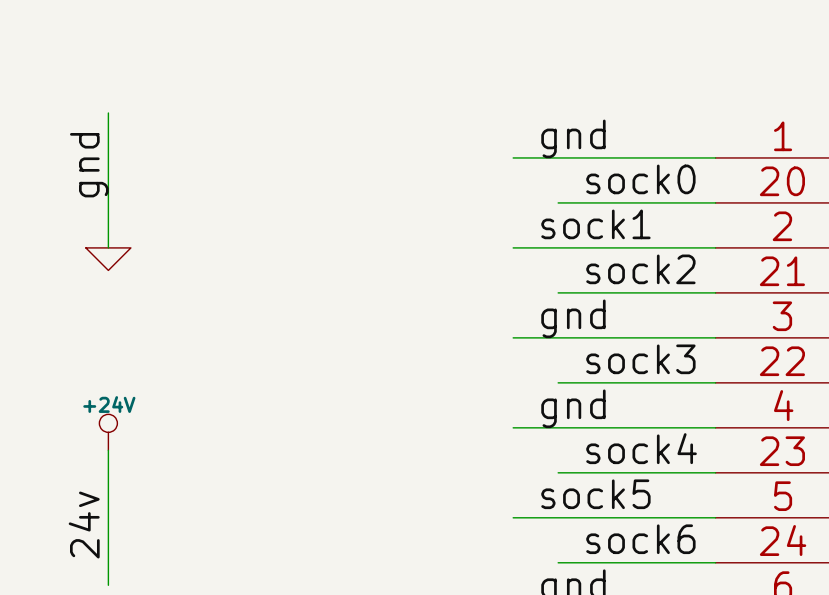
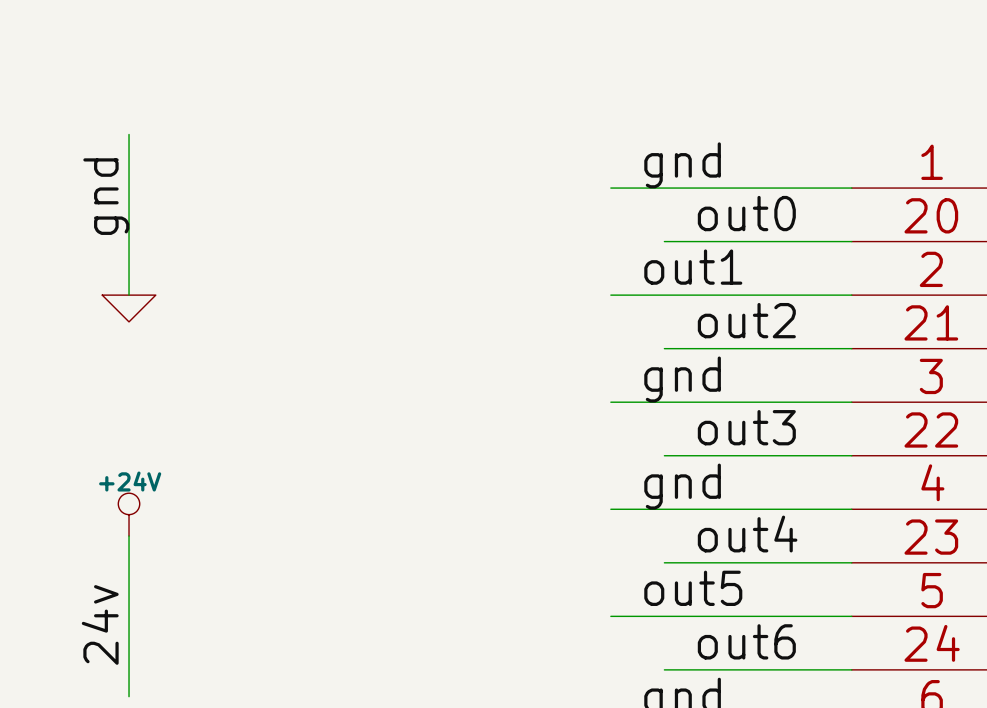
label: sock0 (640, 179) -> out0 (746, 213)
label: sock1 (595, 224) -> out1 (693, 267)
label: sock2 (640, 269) -> out2 (746, 320)
label: sock3 (640, 359) -> out3 (746, 427)
label: sock4 (641, 448) -> out4 (747, 534)
label: sock5 (595, 494) -> out5 (693, 588)
label: sock6 (640, 539) -> out6 (746, 641)

